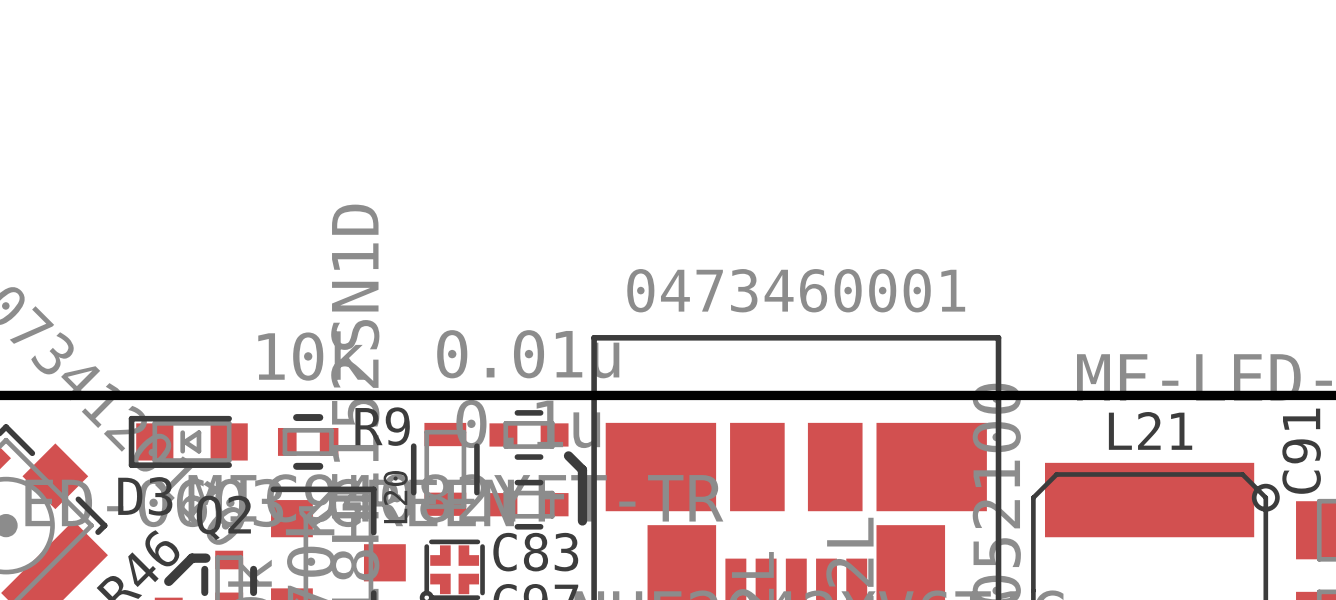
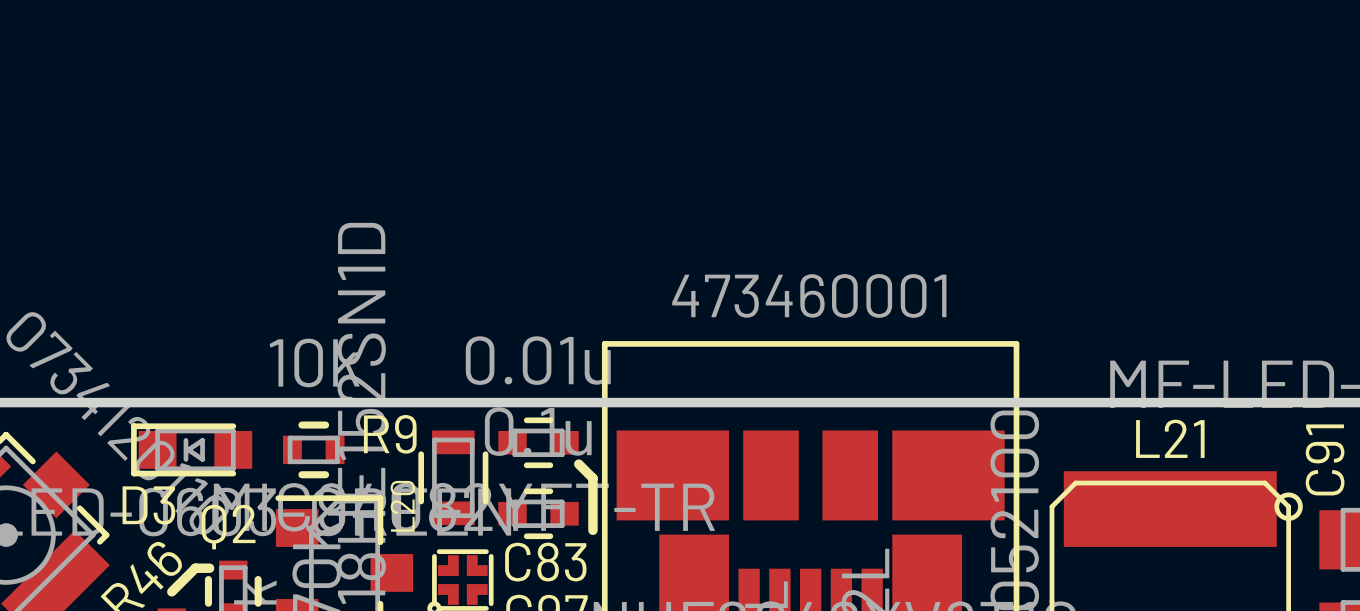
part value: 0473460001 (796, 290) -> 473460001 (809, 295)

